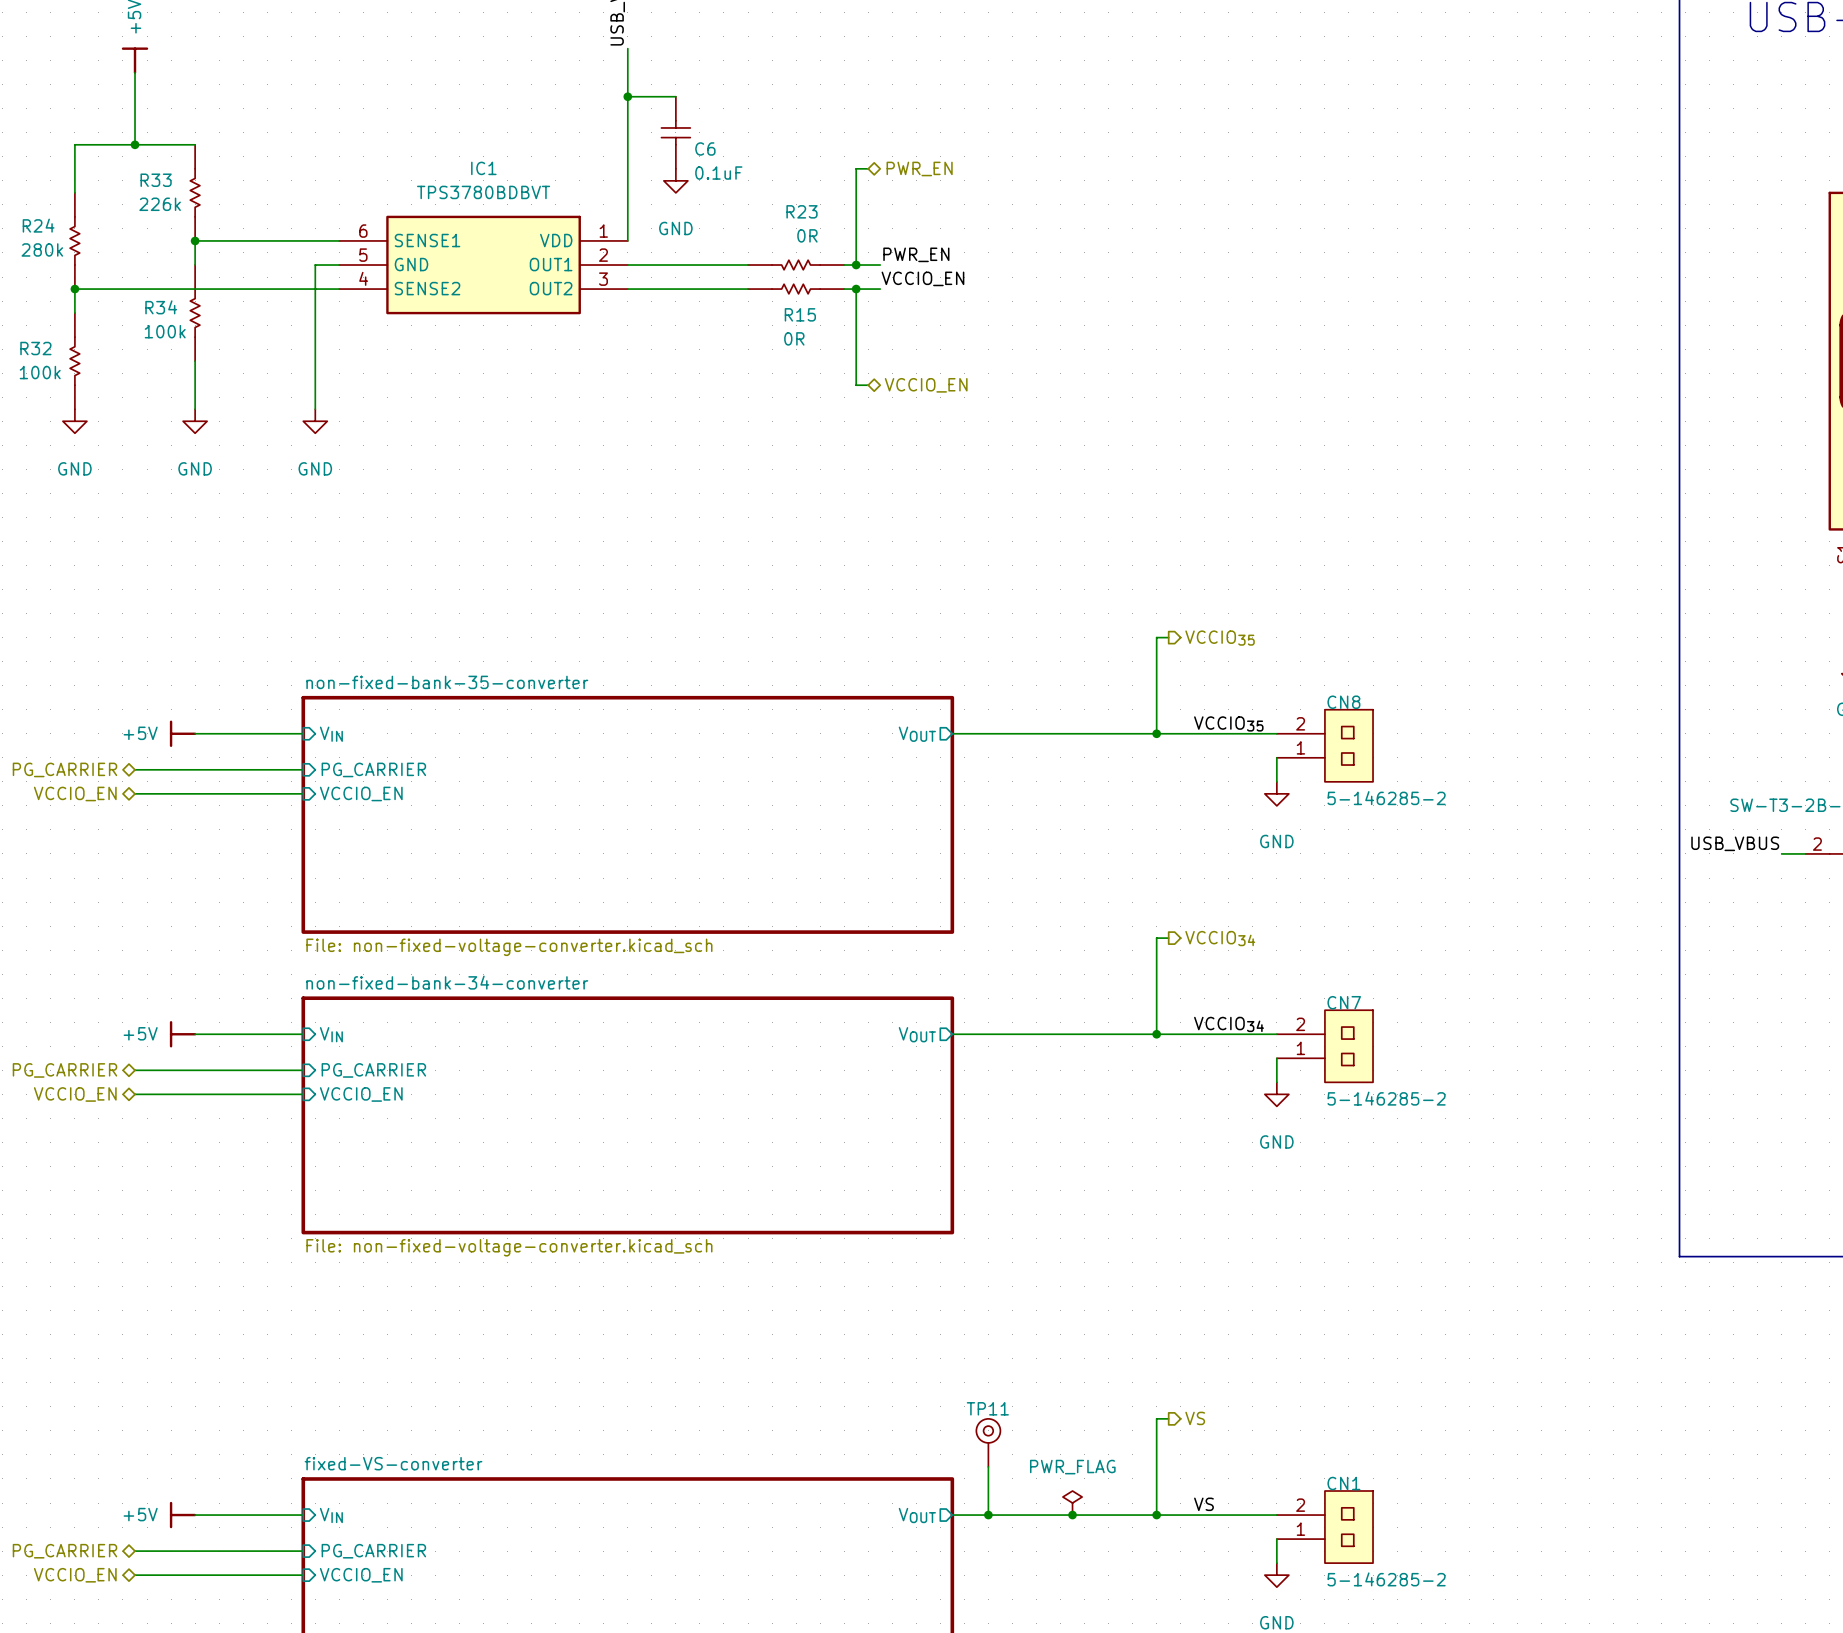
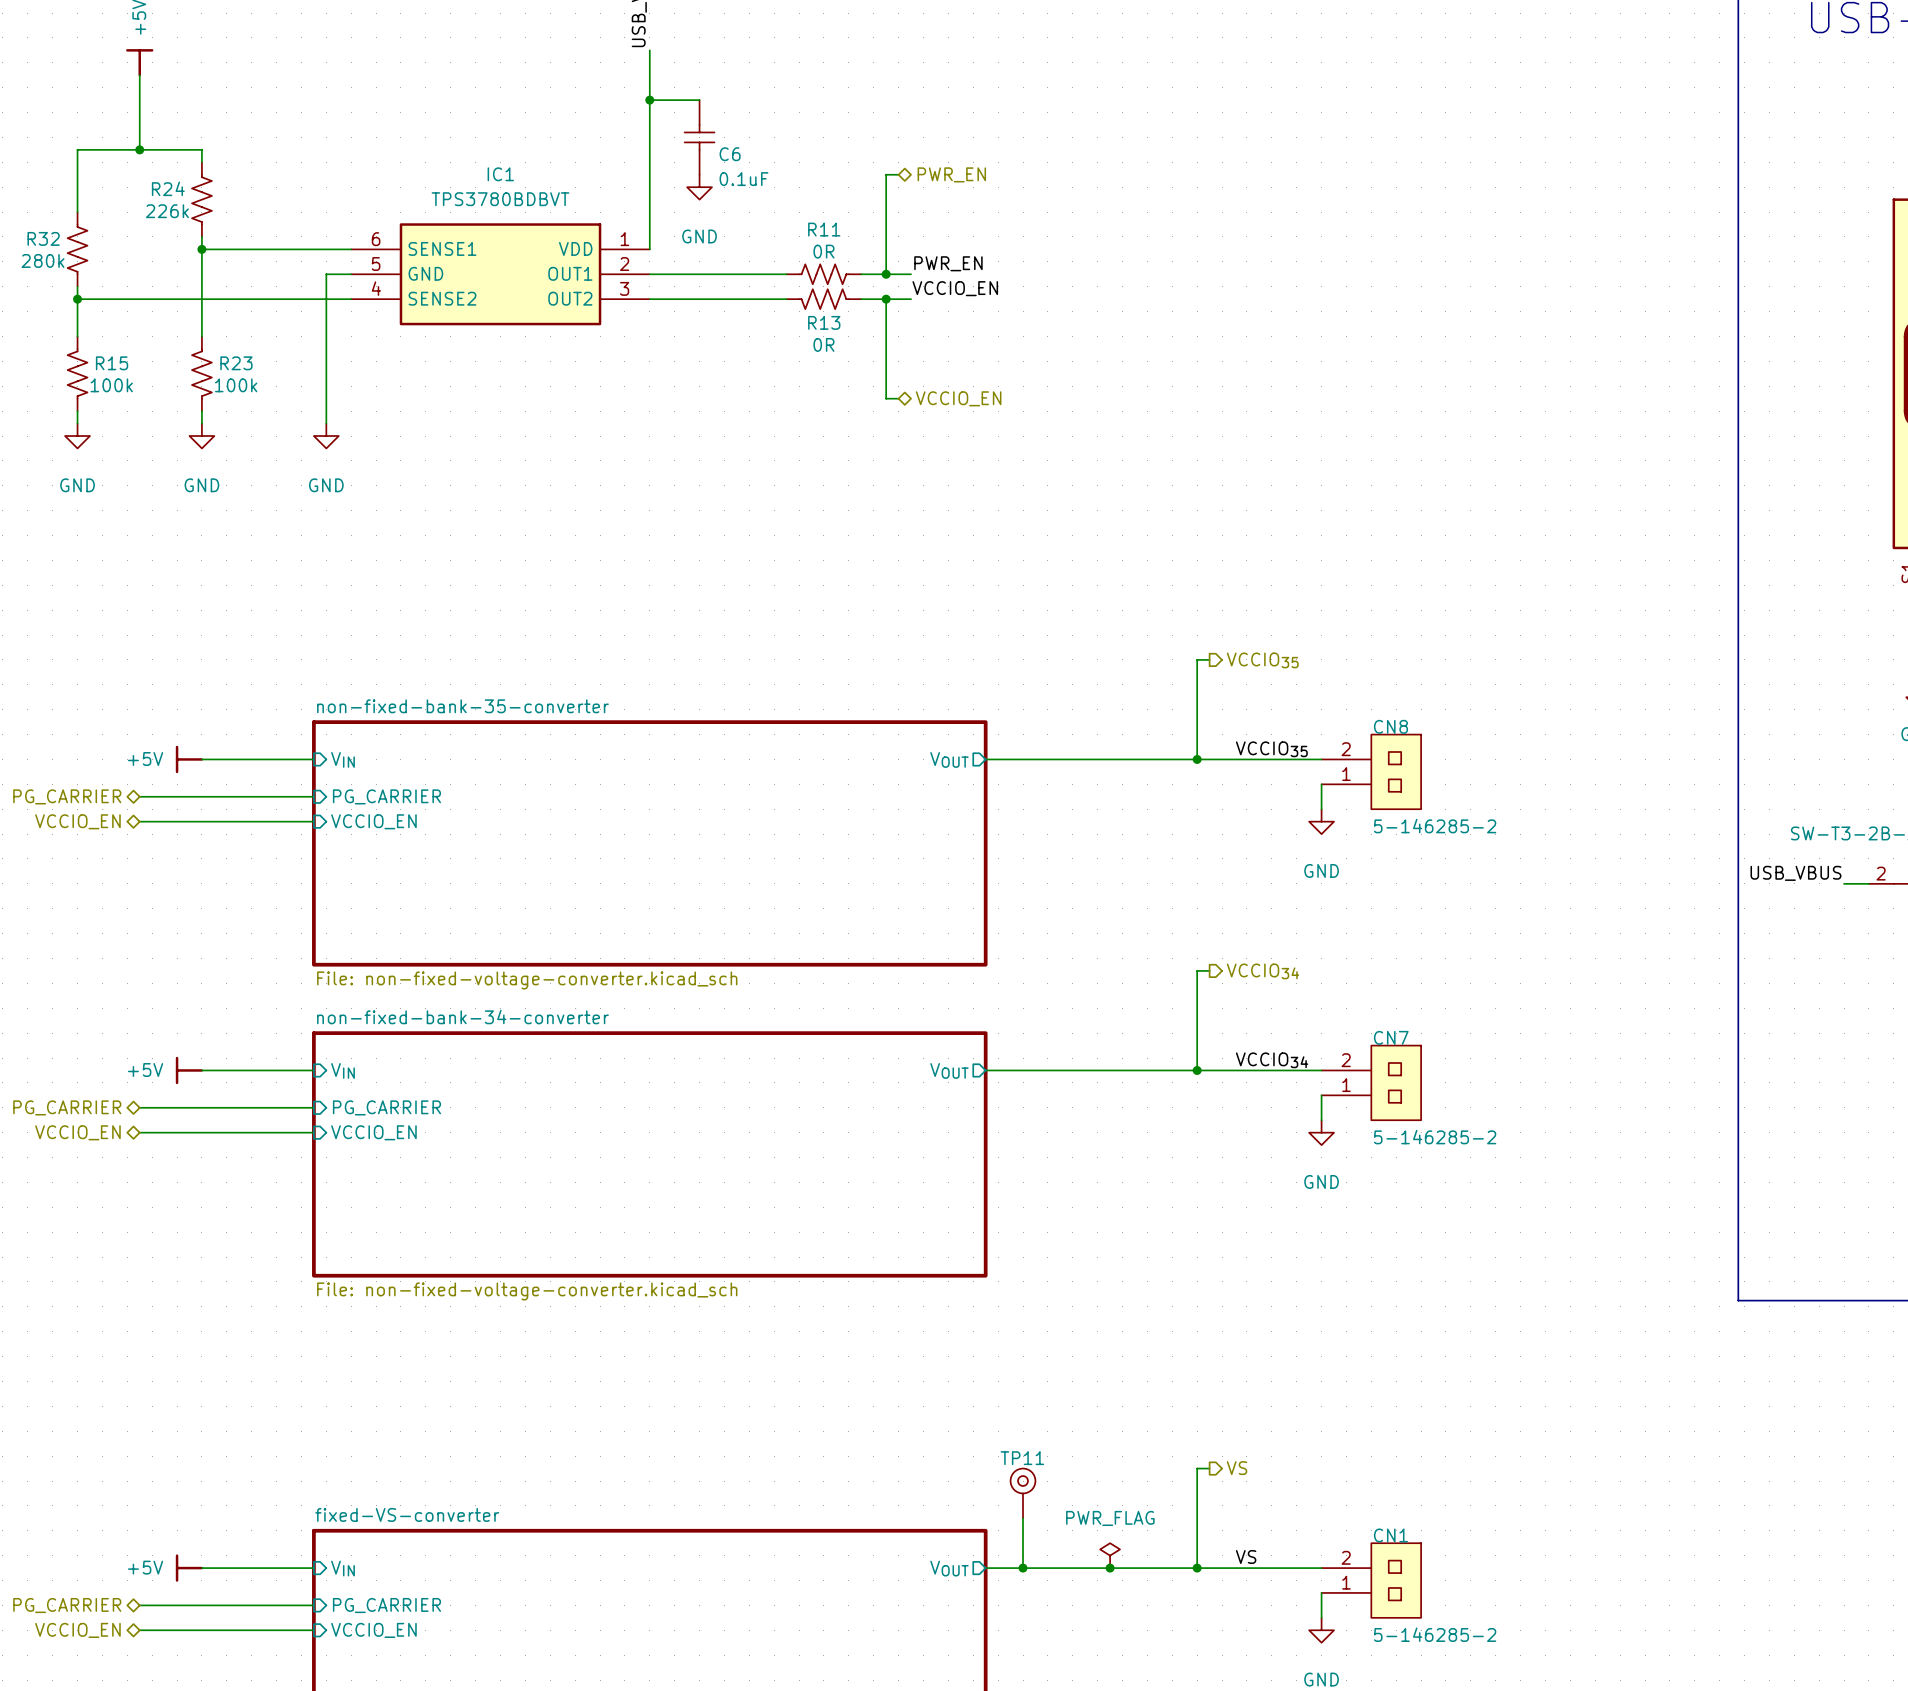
R24 symbol: [70, 192, 80, 290] -> [191, 162, 212, 237]
R33: 226k (195, 192) -> none
R23 name position: R23 (802, 211) -> R23 (236, 363)
R23 value: 0R (807, 235) -> 100k (236, 385)
R24 value: 280k (42, 249) -> 226k (167, 211)
R23 symbol: [748, 260, 845, 270] -> [191, 336, 212, 412]
R11: none -> 0R (823, 274)
R15 symbol: [748, 284, 845, 294] -> [67, 336, 88, 412]
R13: none -> 0R (823, 299)
R32 symbol: [70, 313, 80, 410] -> [67, 212, 88, 287]
R34: 100k (195, 313) -> none
R15 name position: R15 (800, 314) -> R15 (112, 363)
R15 value: 0R (794, 338) -> 100k (111, 385)
R32 value: 100k (40, 372) -> 280k (43, 260)

